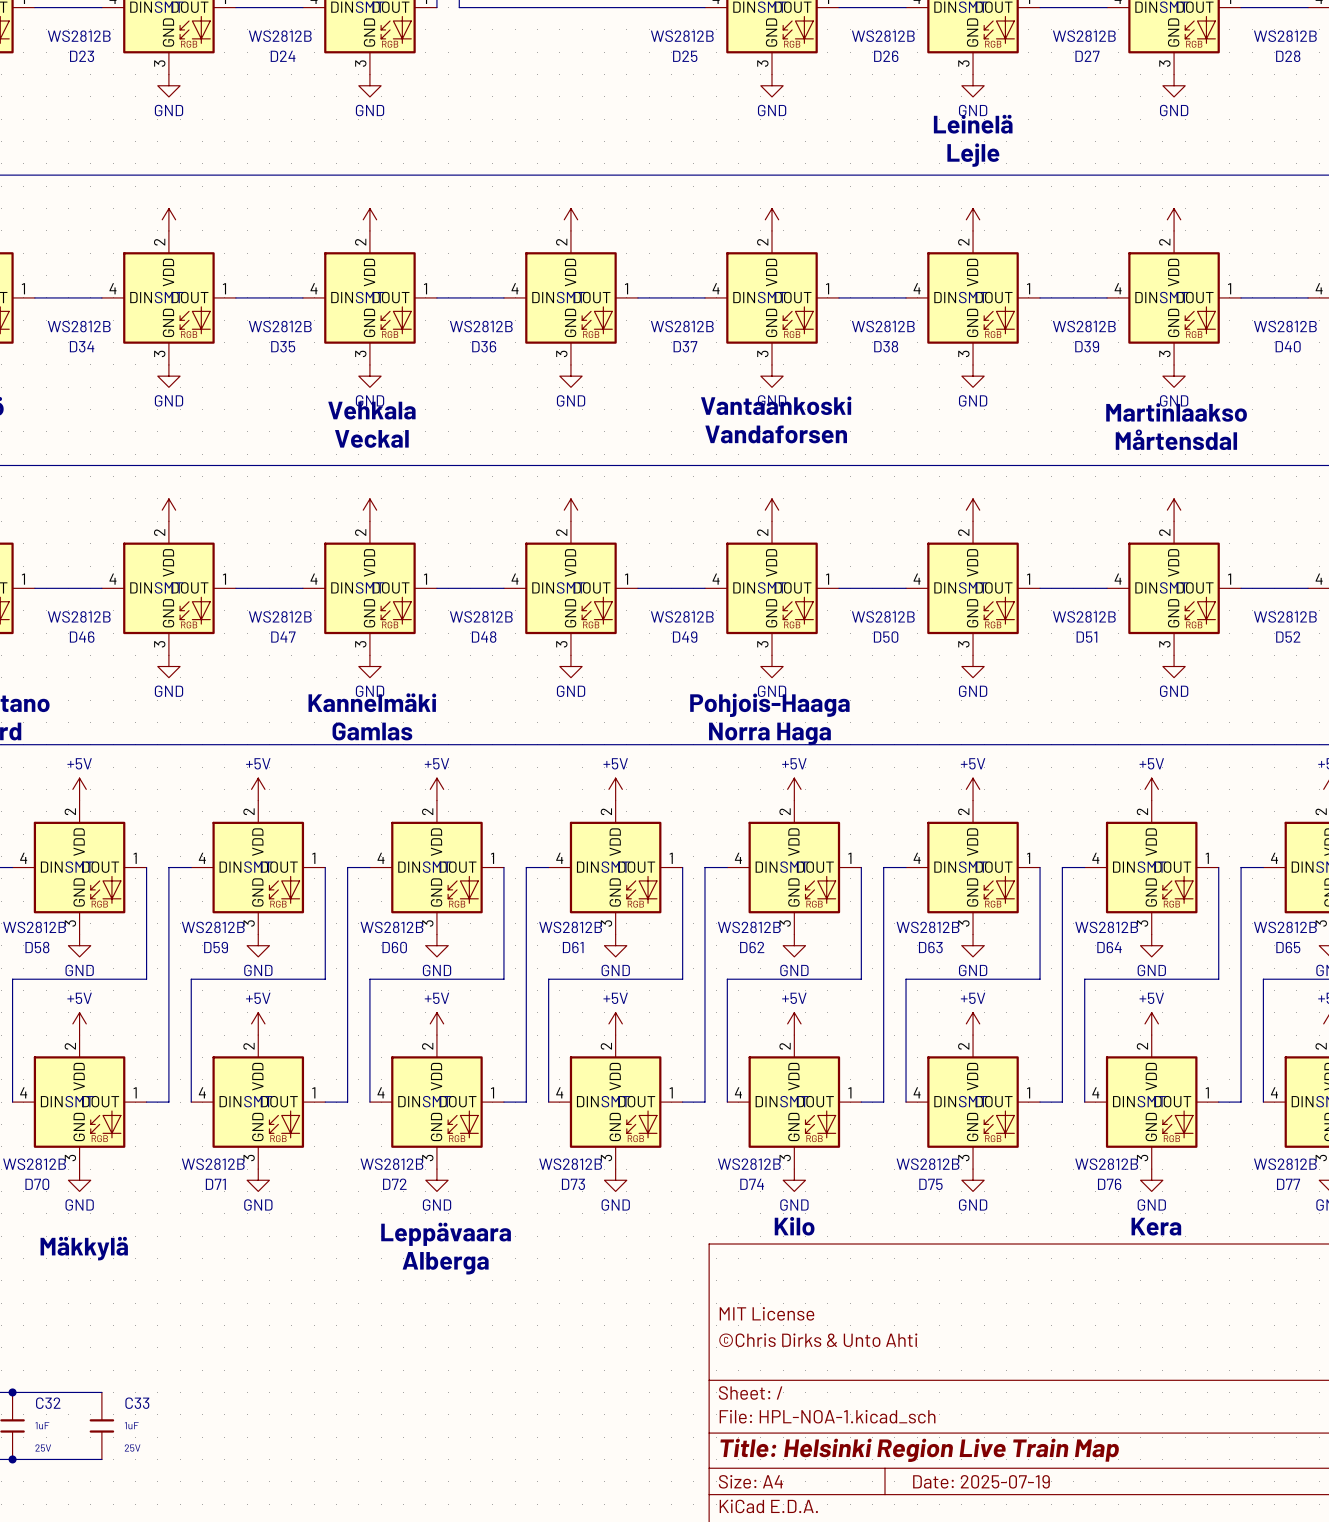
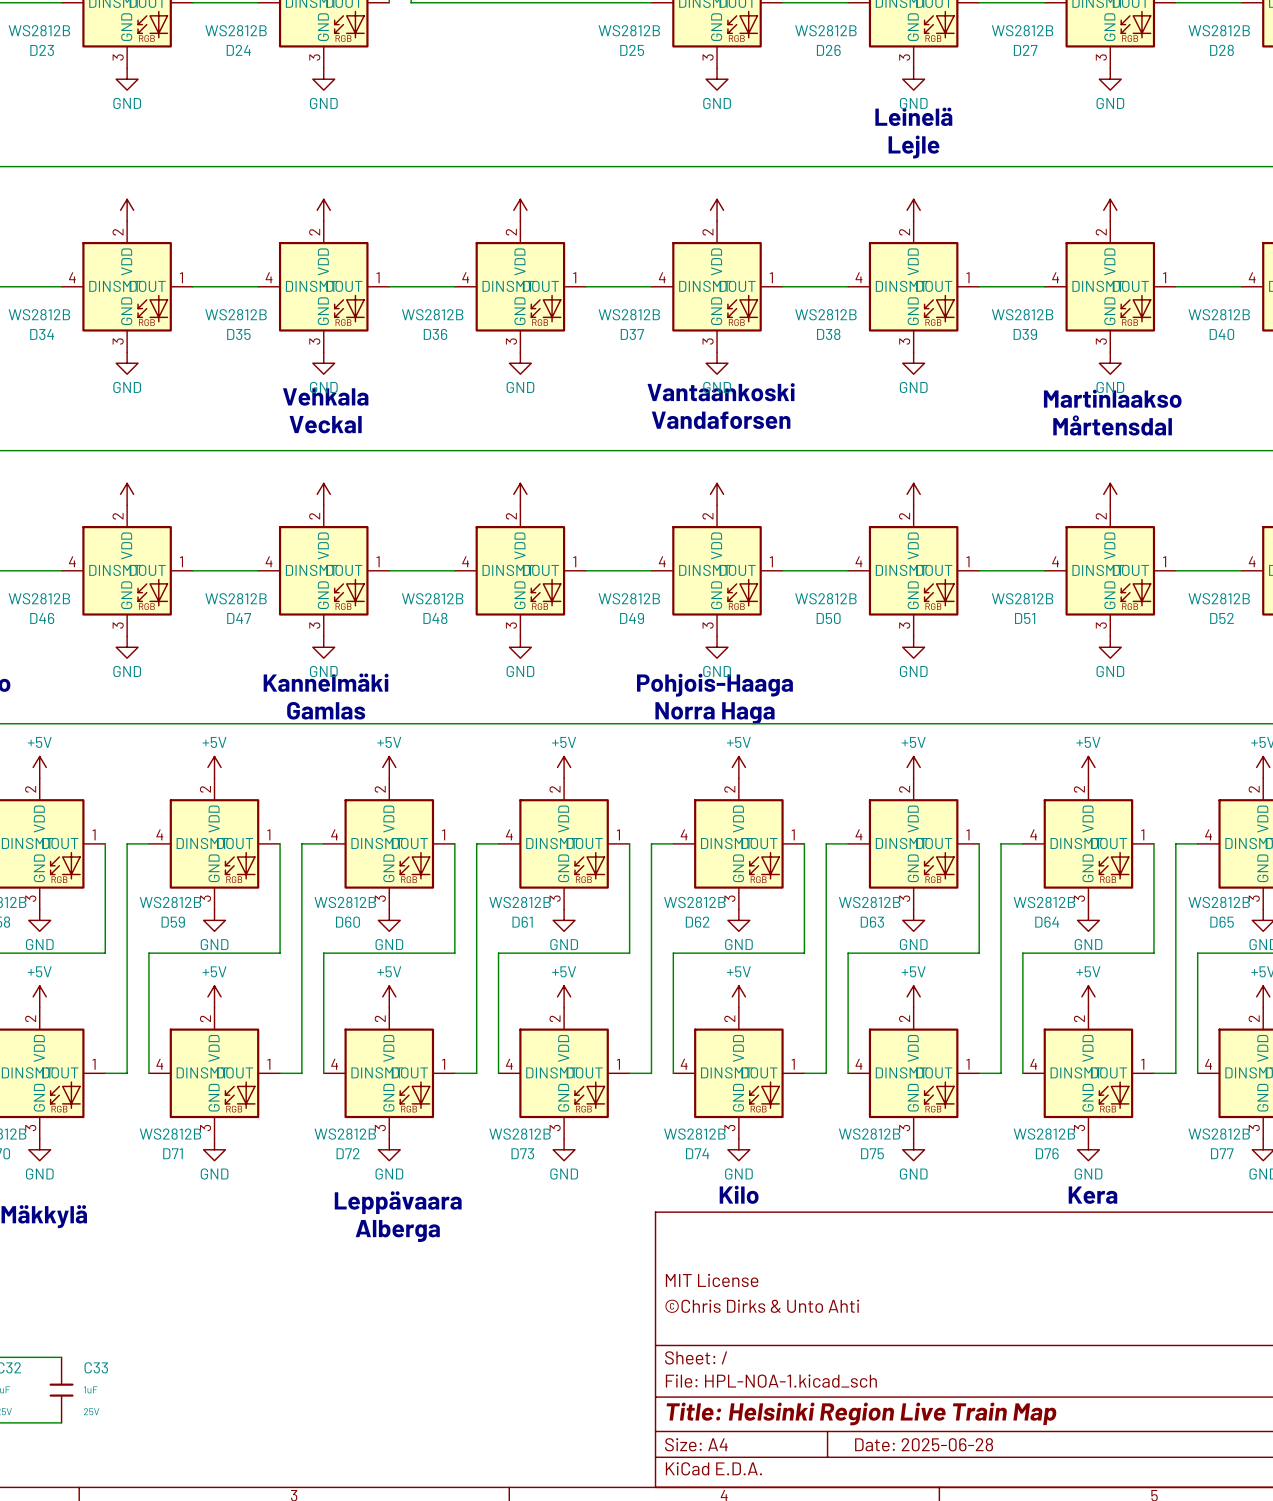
title block: Date: 2025-07-19 (981, 1481) -> Date: 2025-06-28 (924, 1444)

